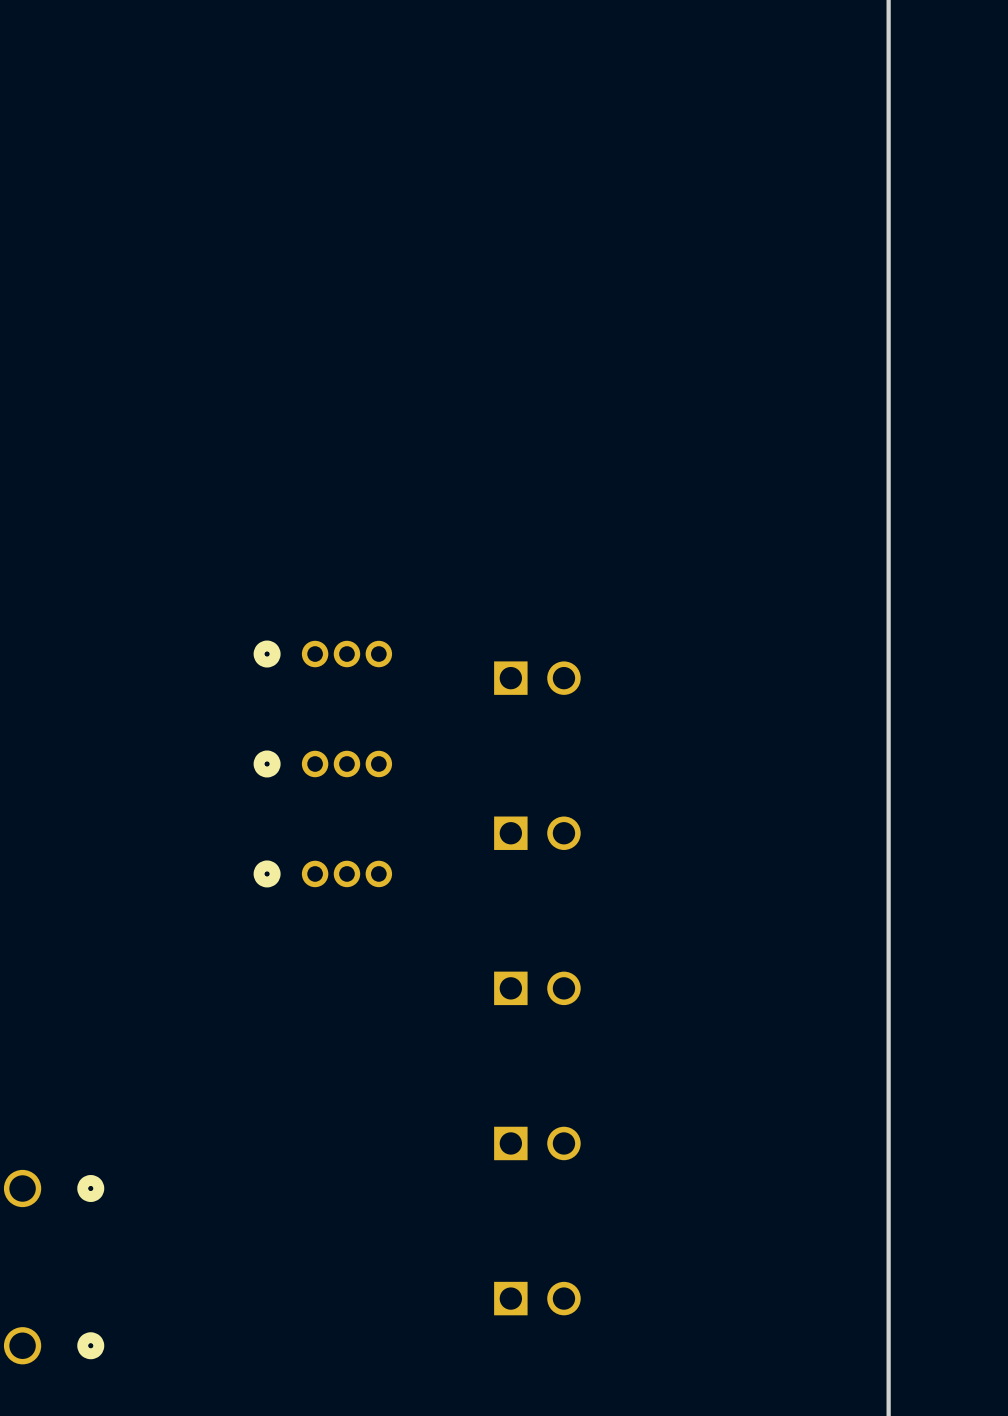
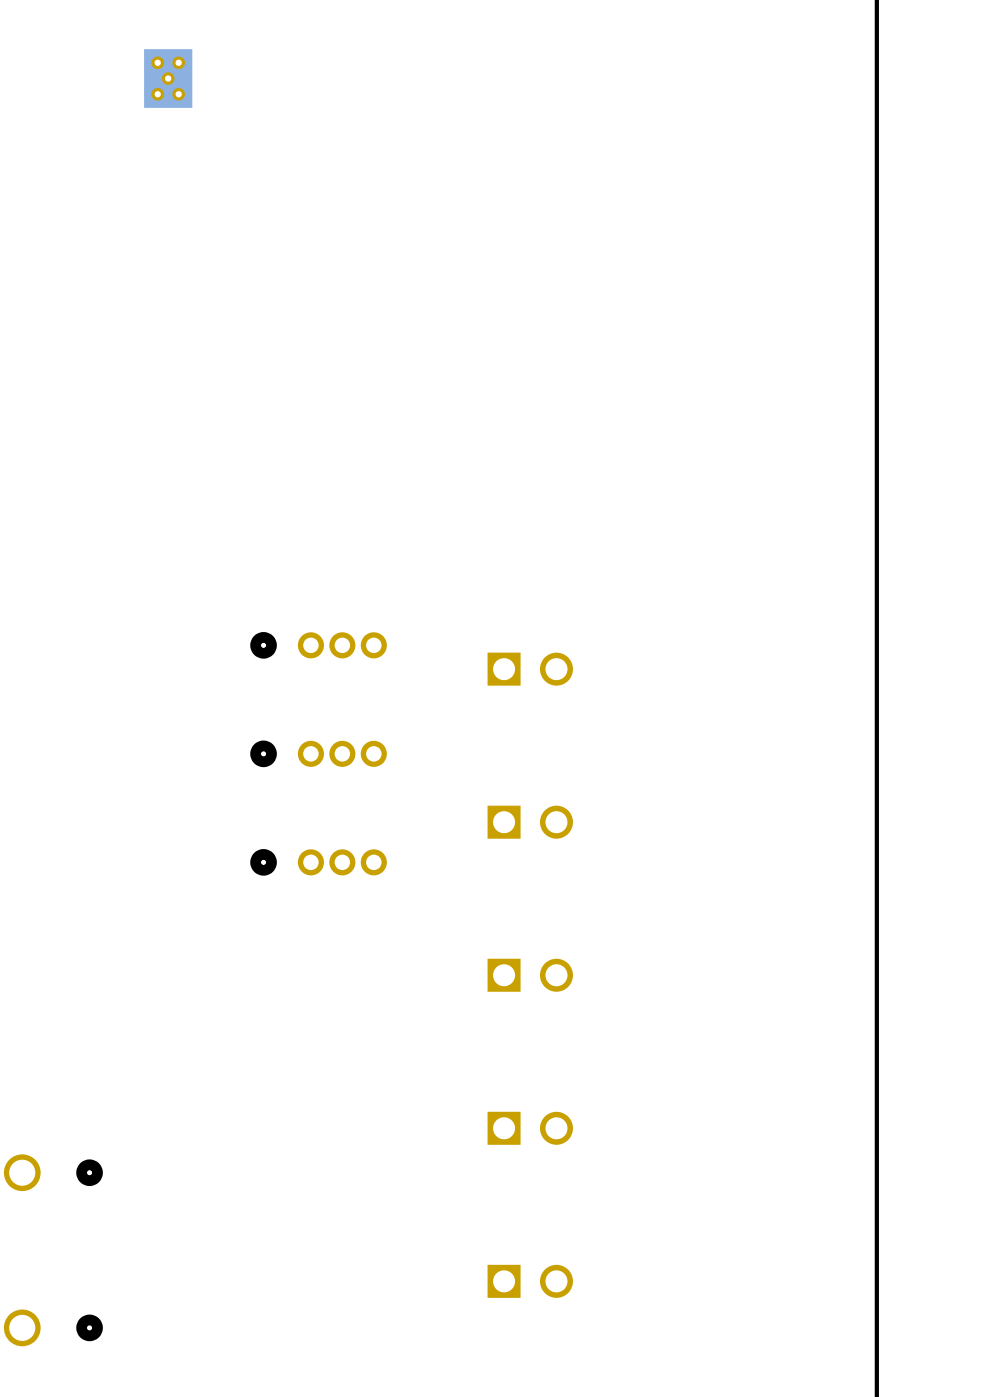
part: none -> (168, 78)

